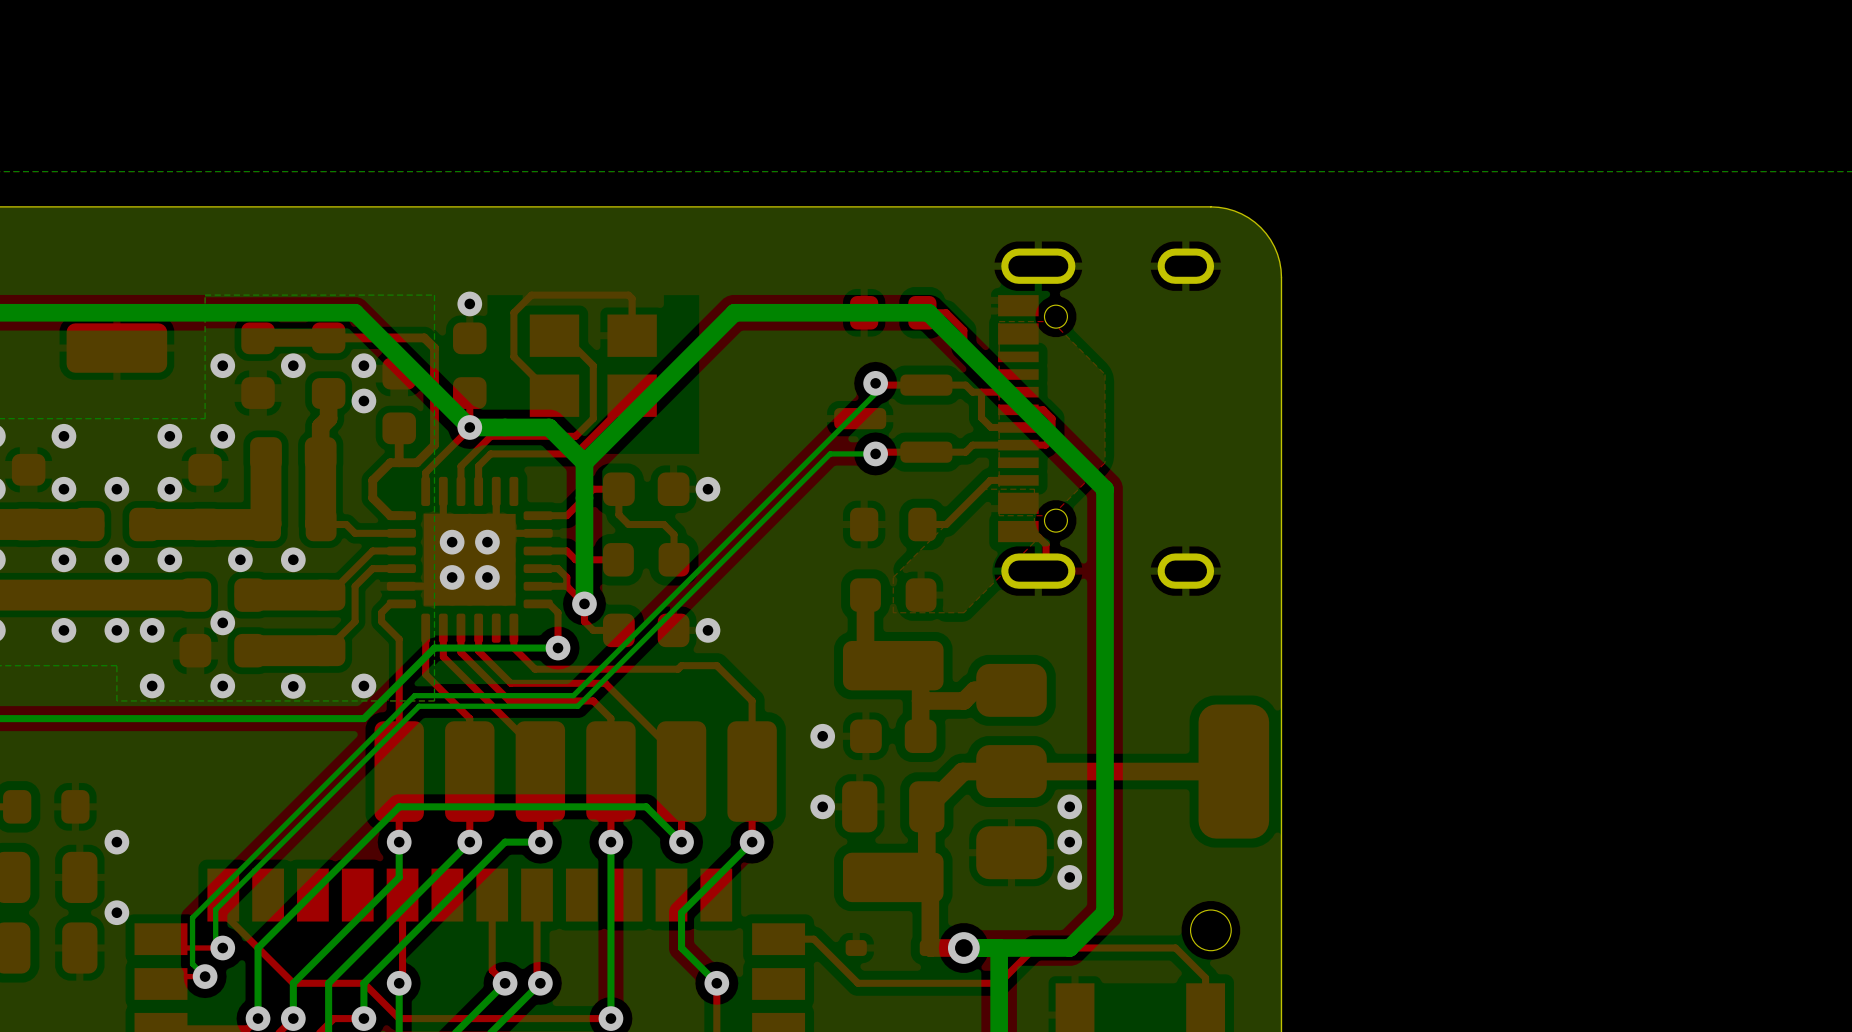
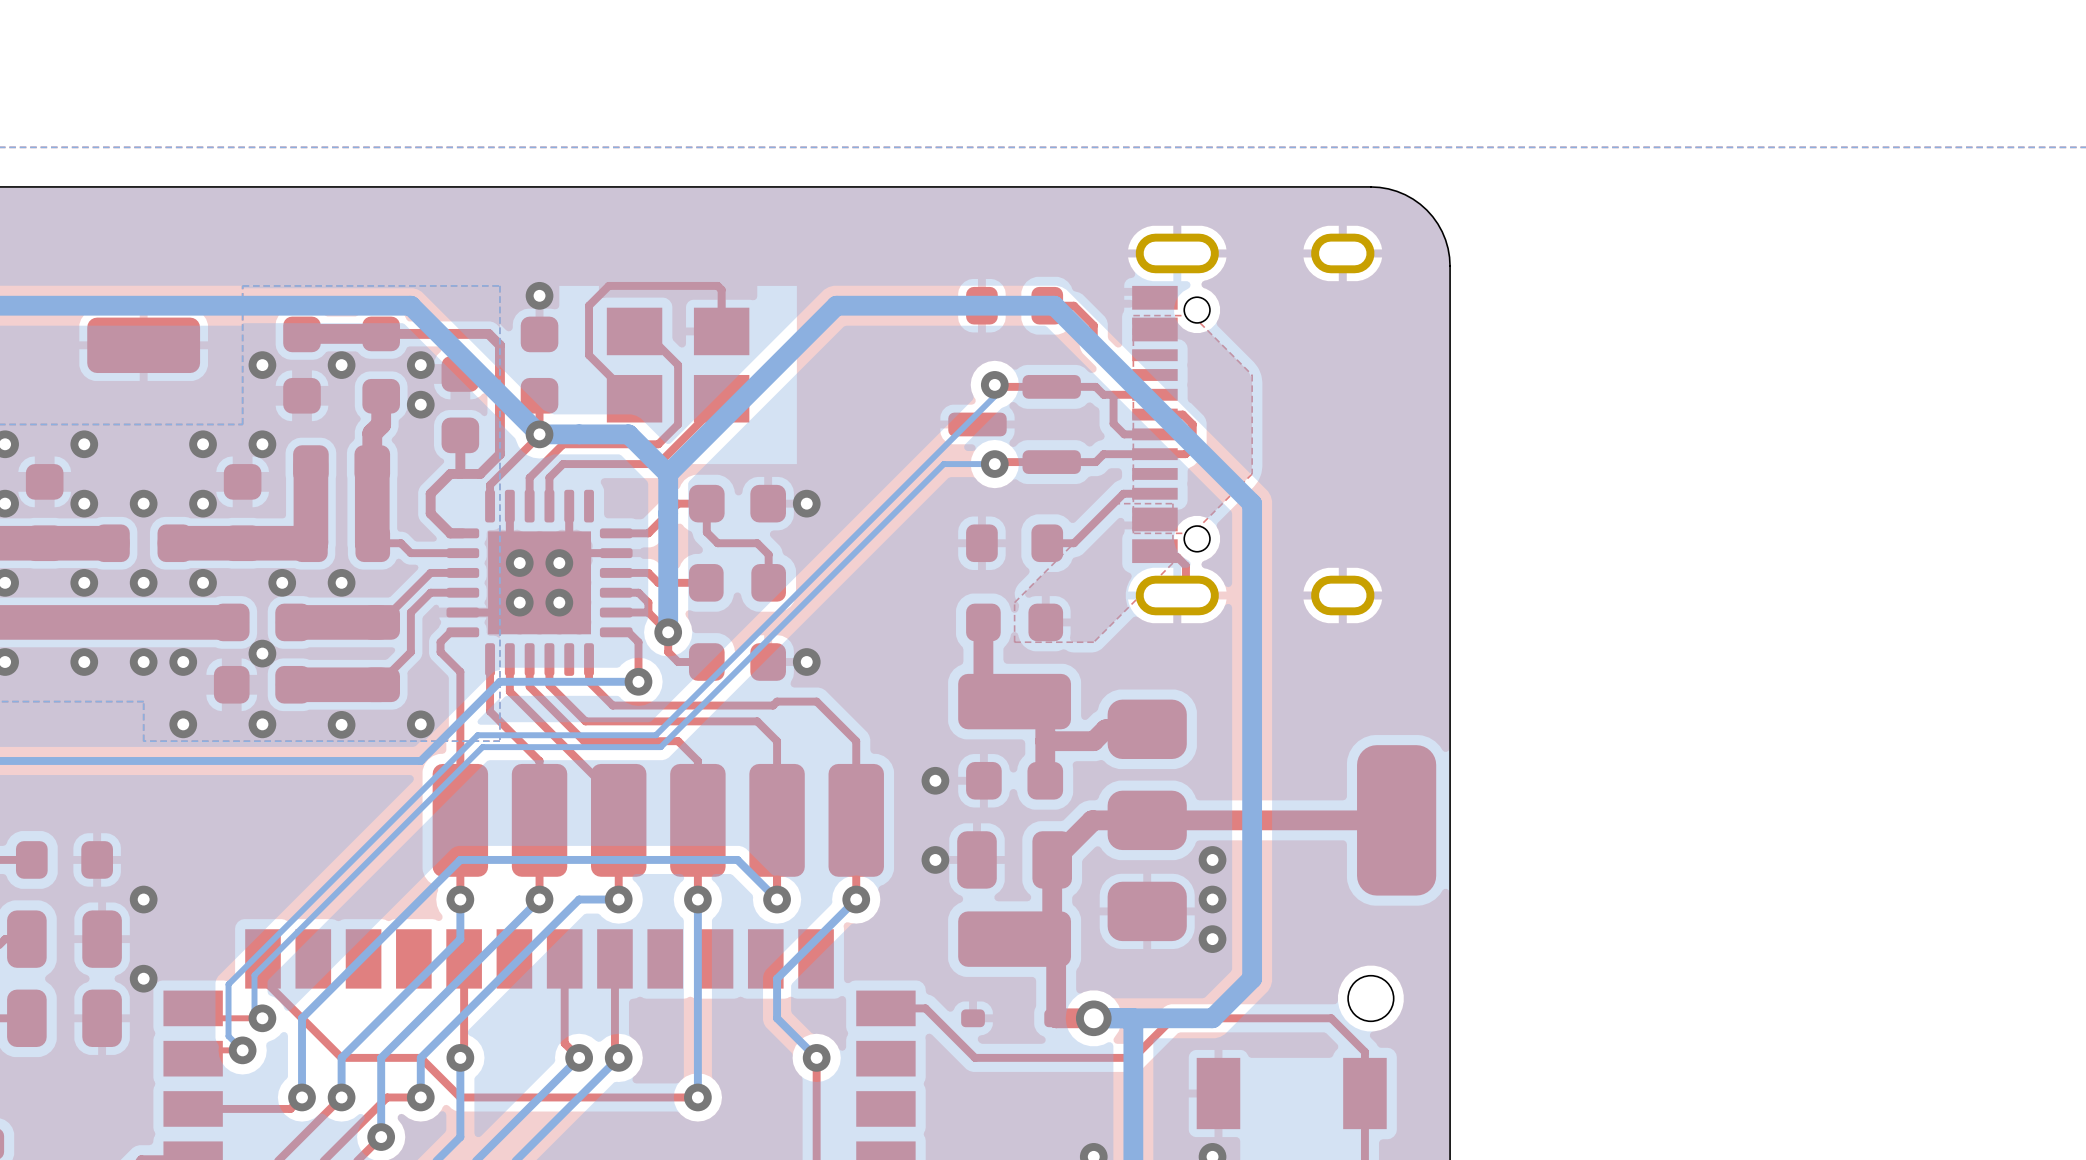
top track: (605, 683) (681, 759) -> (691, 721) (757, 721) (777, 741) (777, 806)

